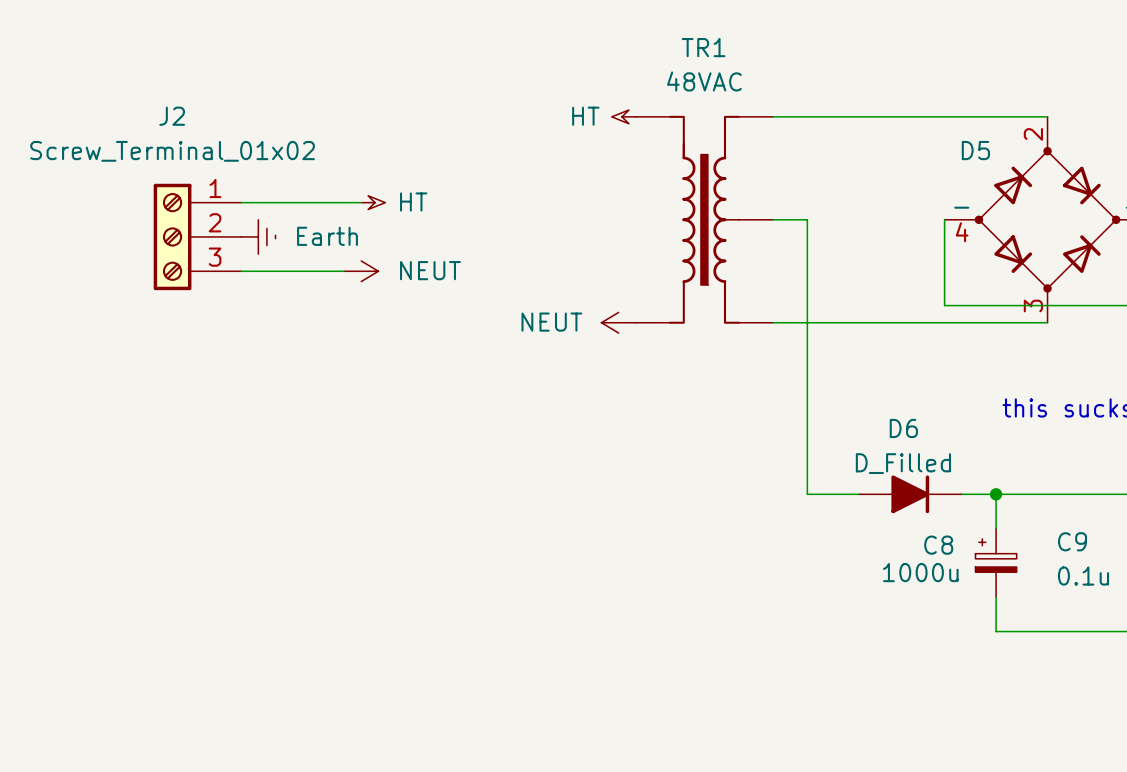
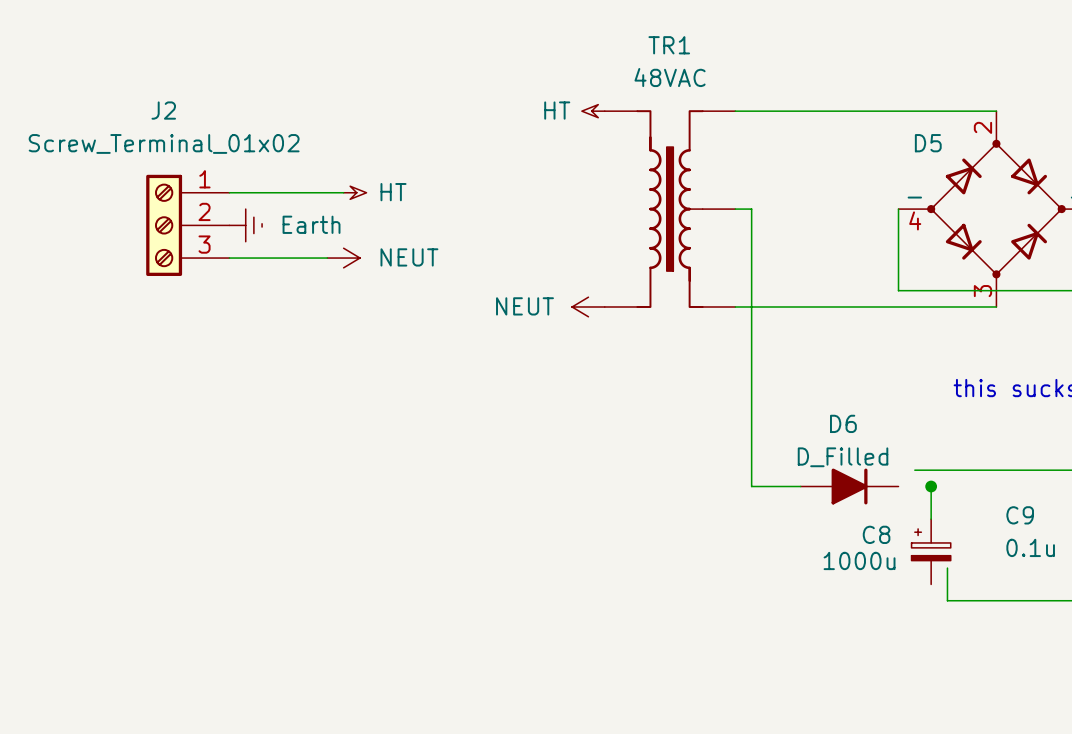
wire: (790, 219) (807, 219) (807, 494) (858, 494) -> (751, 209) (751, 486) (800, 486)
D6 position: (910, 494) -> (849, 486)
wire: (996, 494) (996, 528) -> (931, 486) (931, 519)
junction position: (996, 494) -> (931, 486)
C8 position: (996, 562) -> (931, 551)

